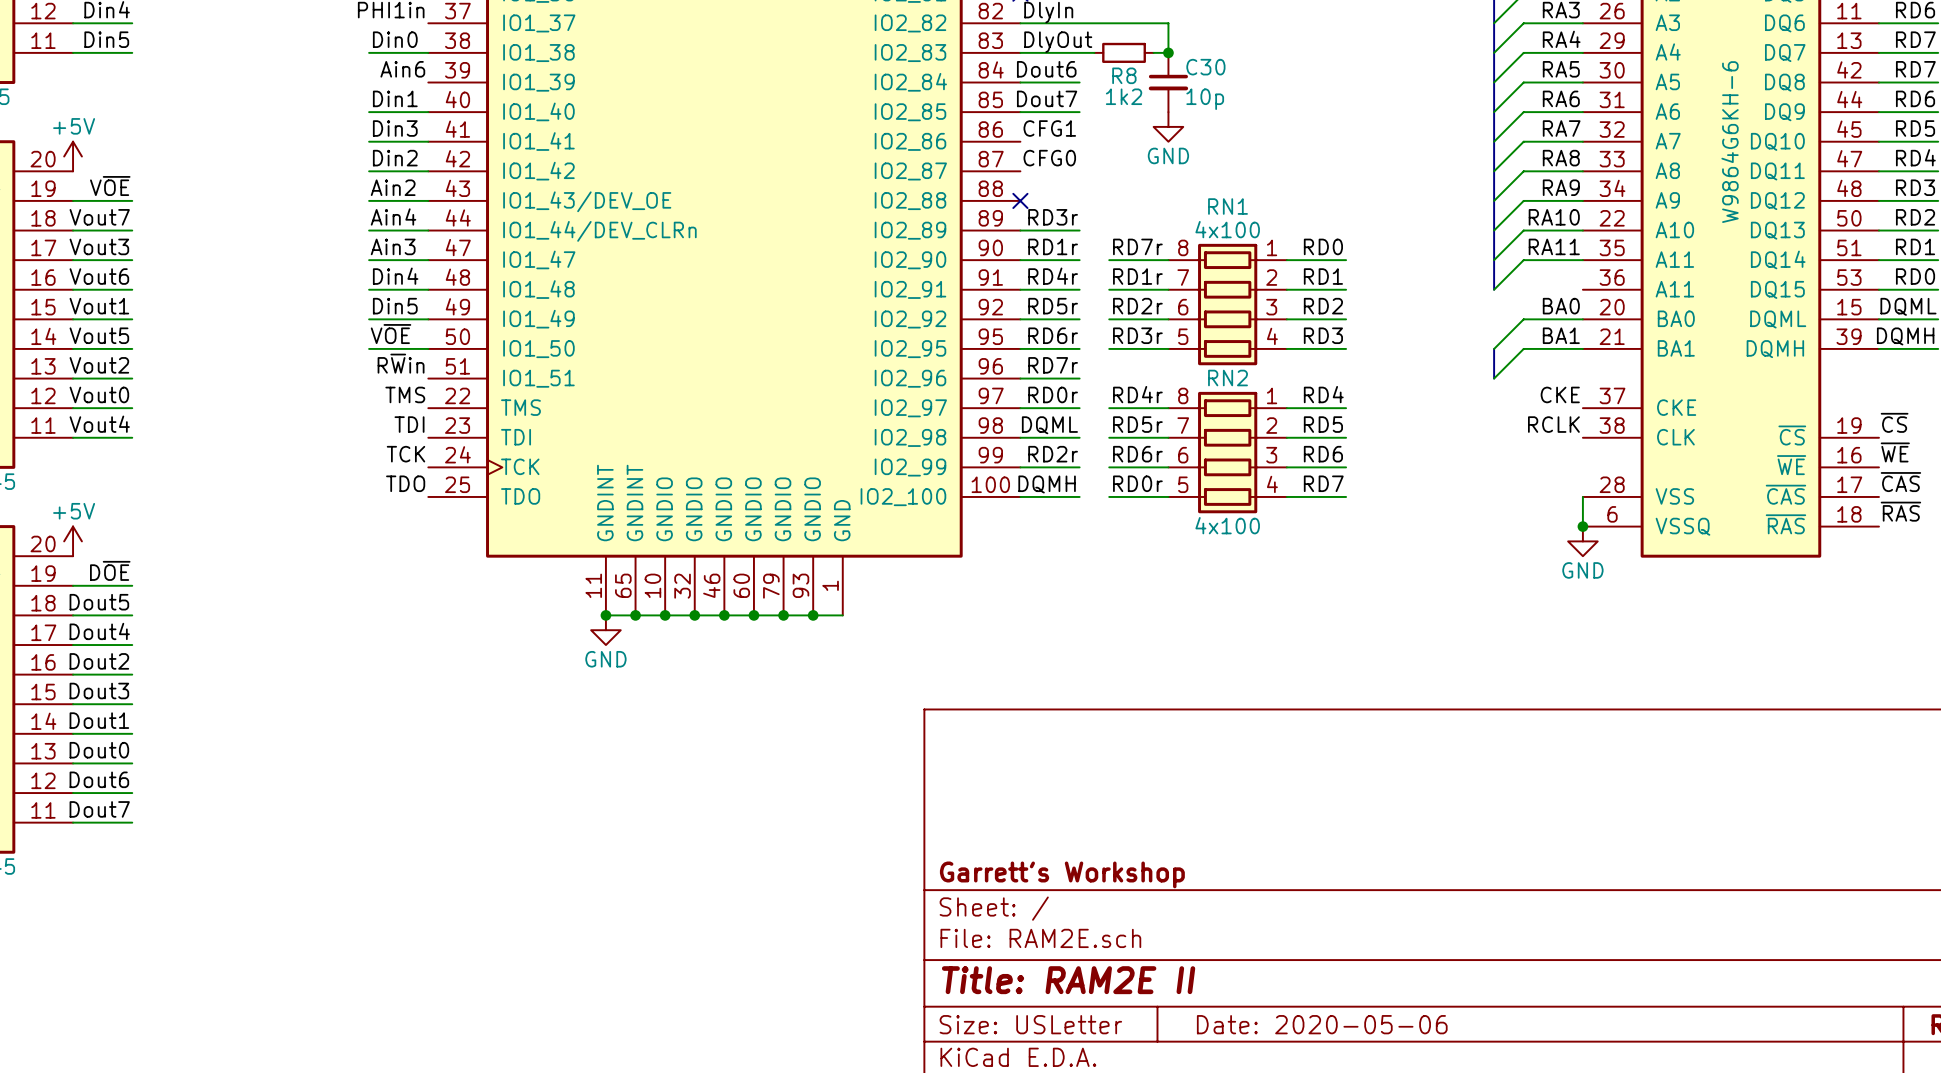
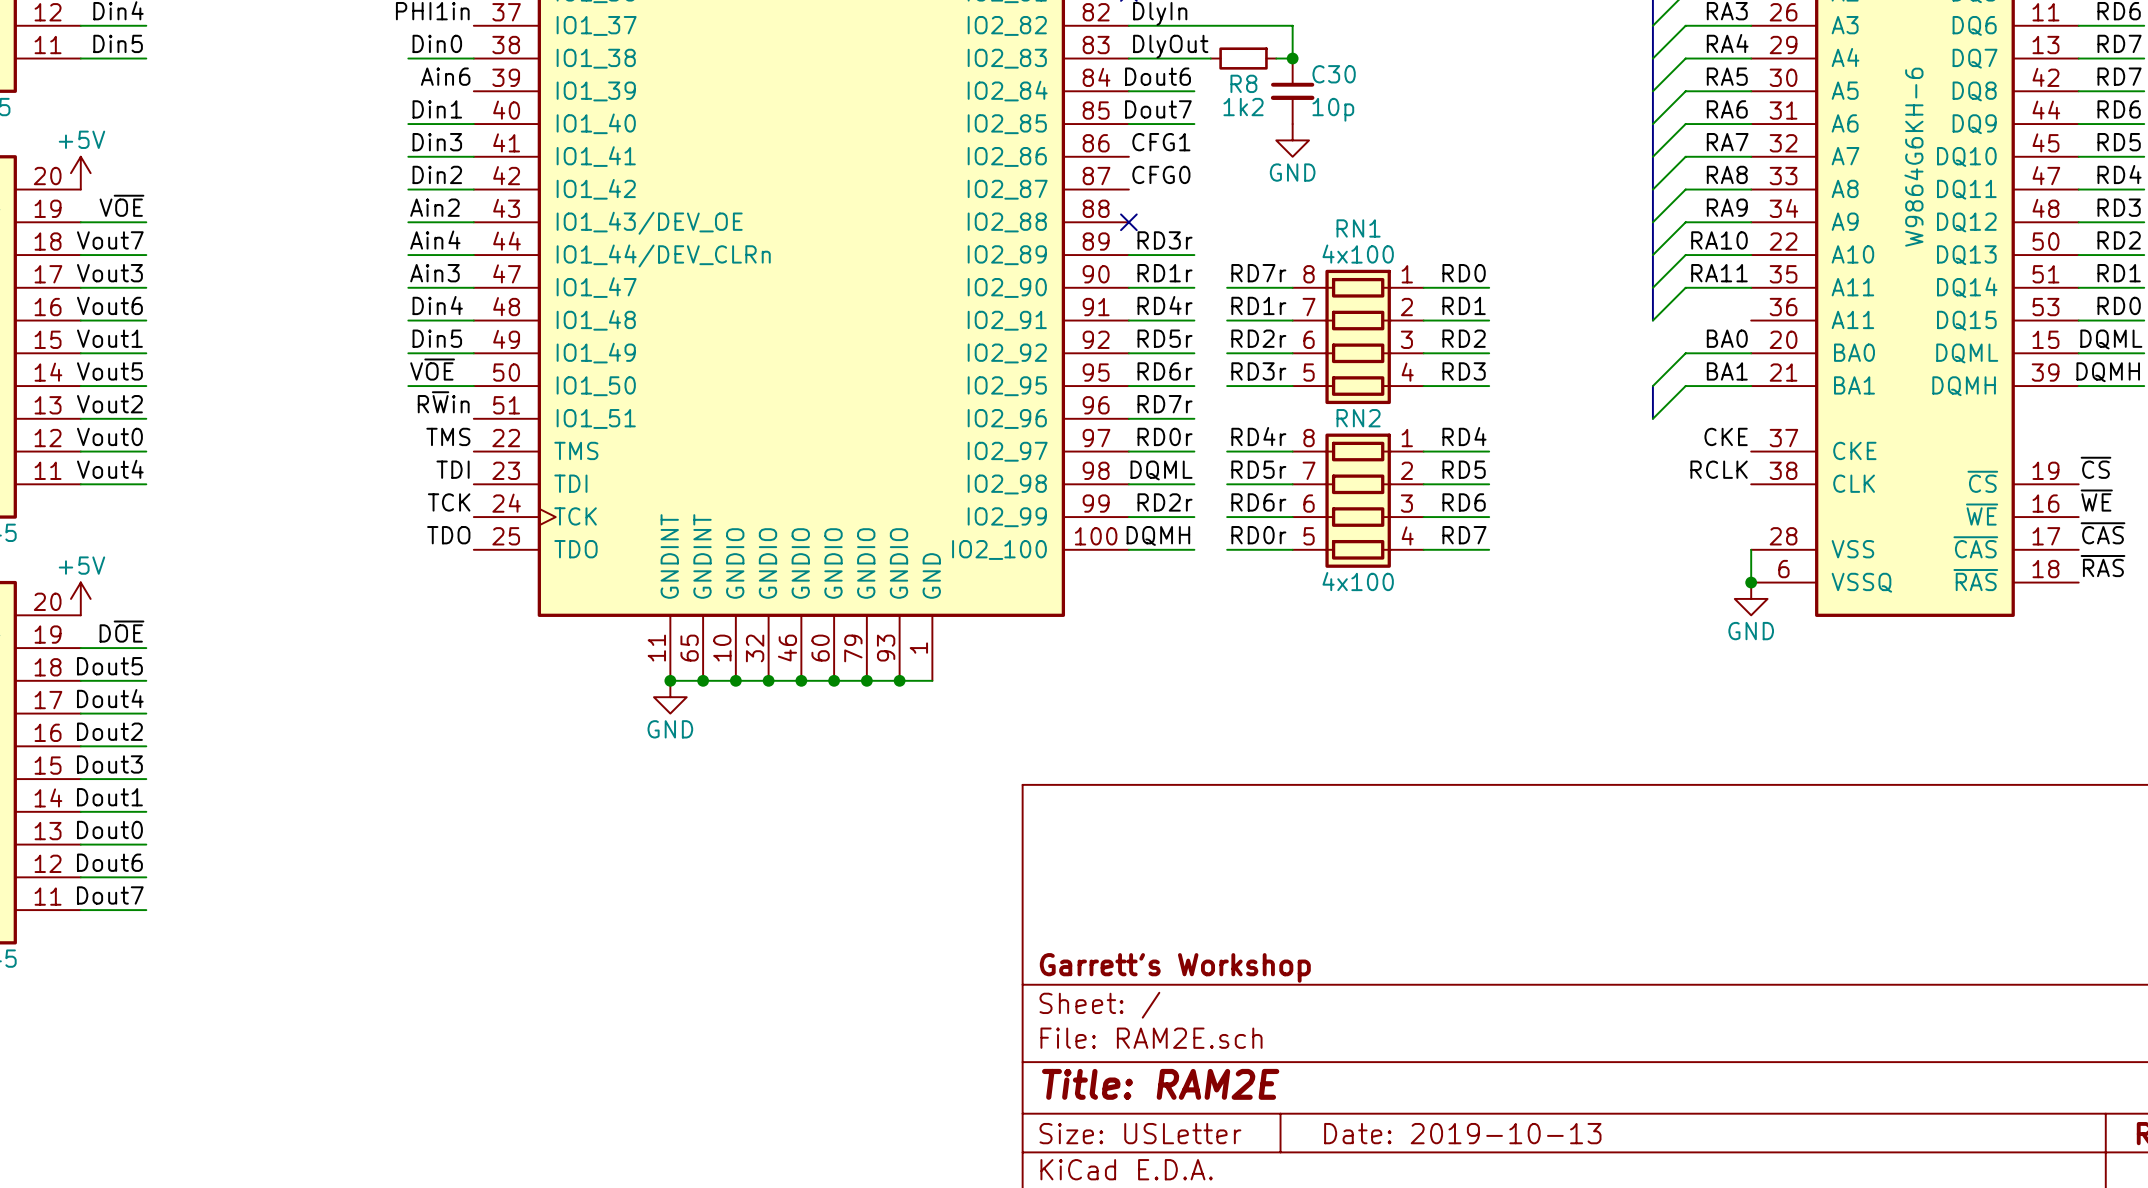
title block: Title: RAM2E II (1068, 980) -> Title: RAM2E (1160, 1084)
title block: Date: 2020-05-06 (1322, 1024) -> Date: 2019-10-13 (1462, 1133)

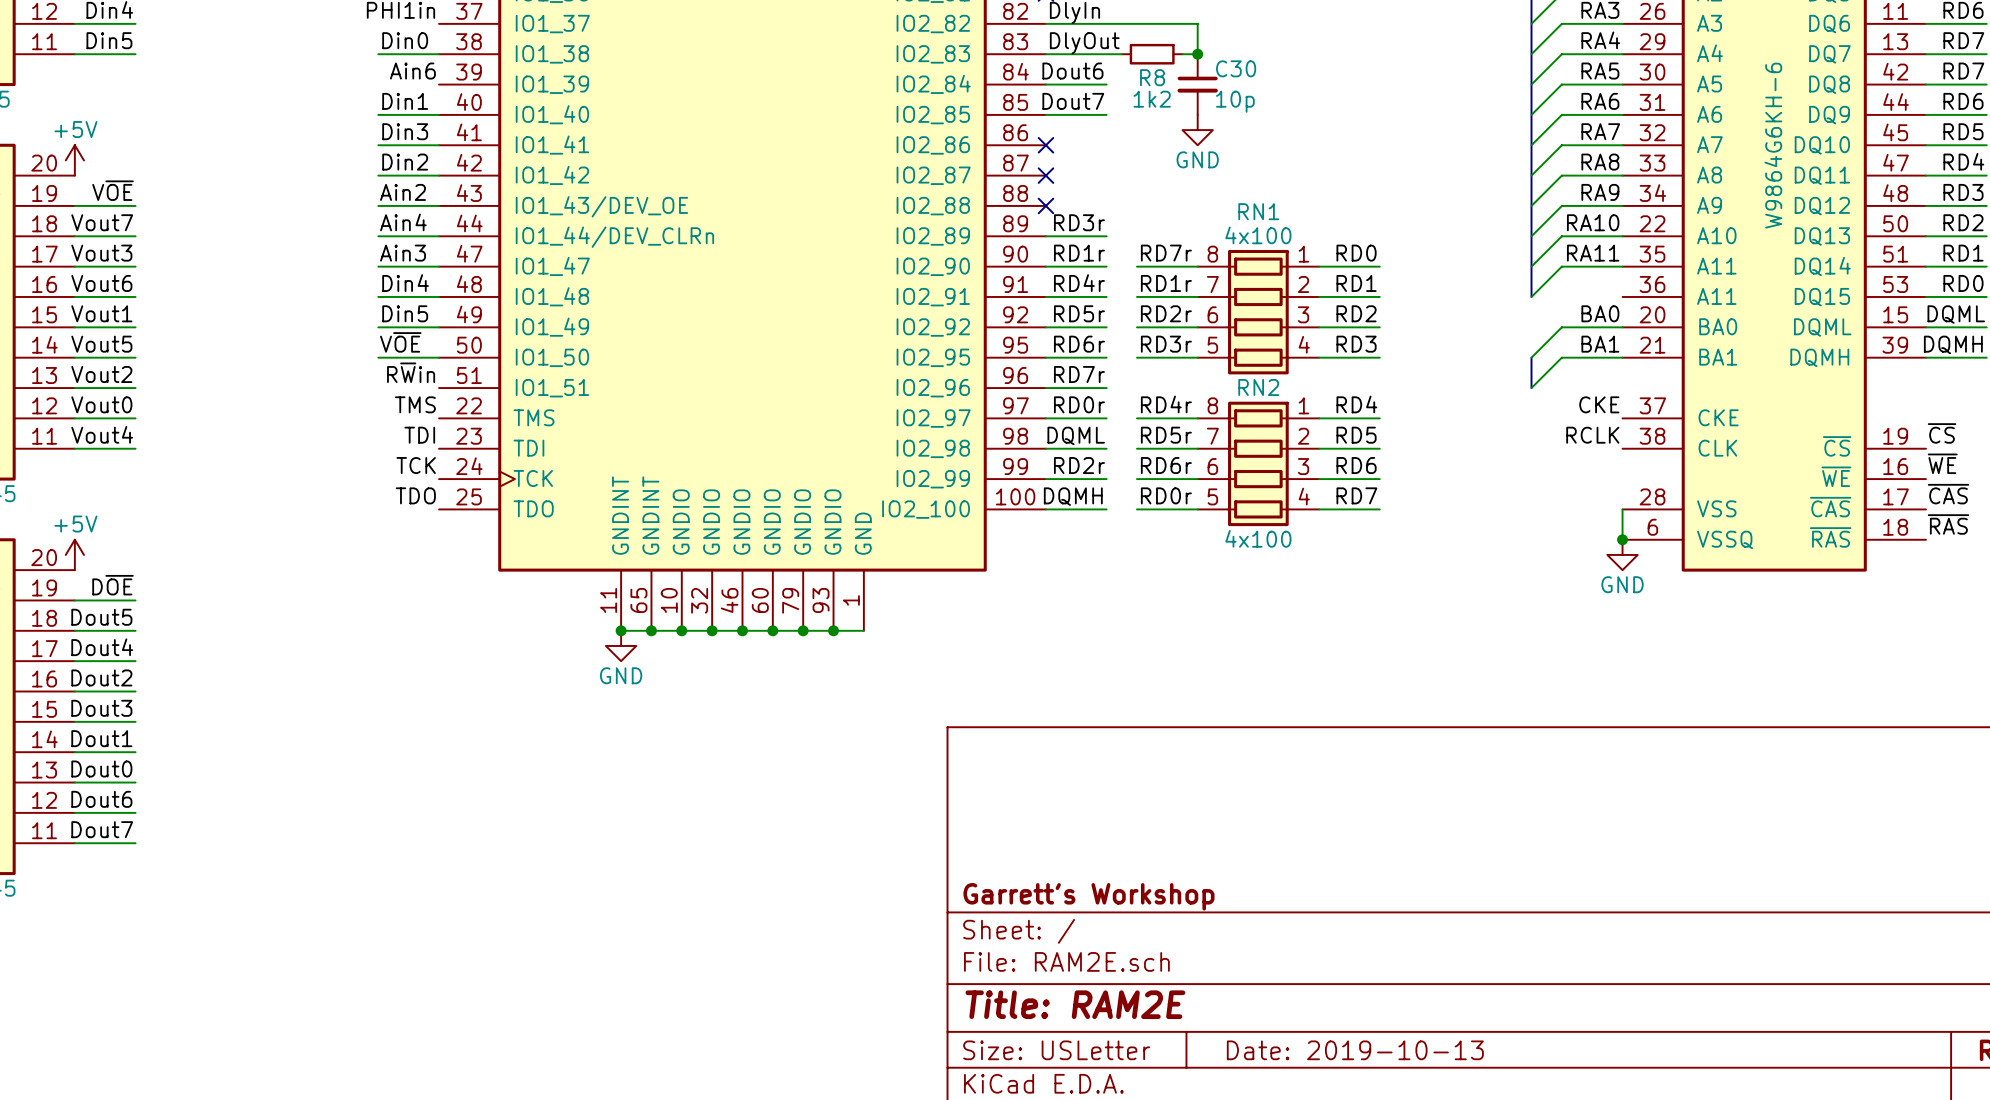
label: CFG1 (1161, 142) -> none
no-connect mark: none -> (1045, 145)
label: CFG0 (1161, 174) -> none
no-connect mark: none -> (1045, 175)

